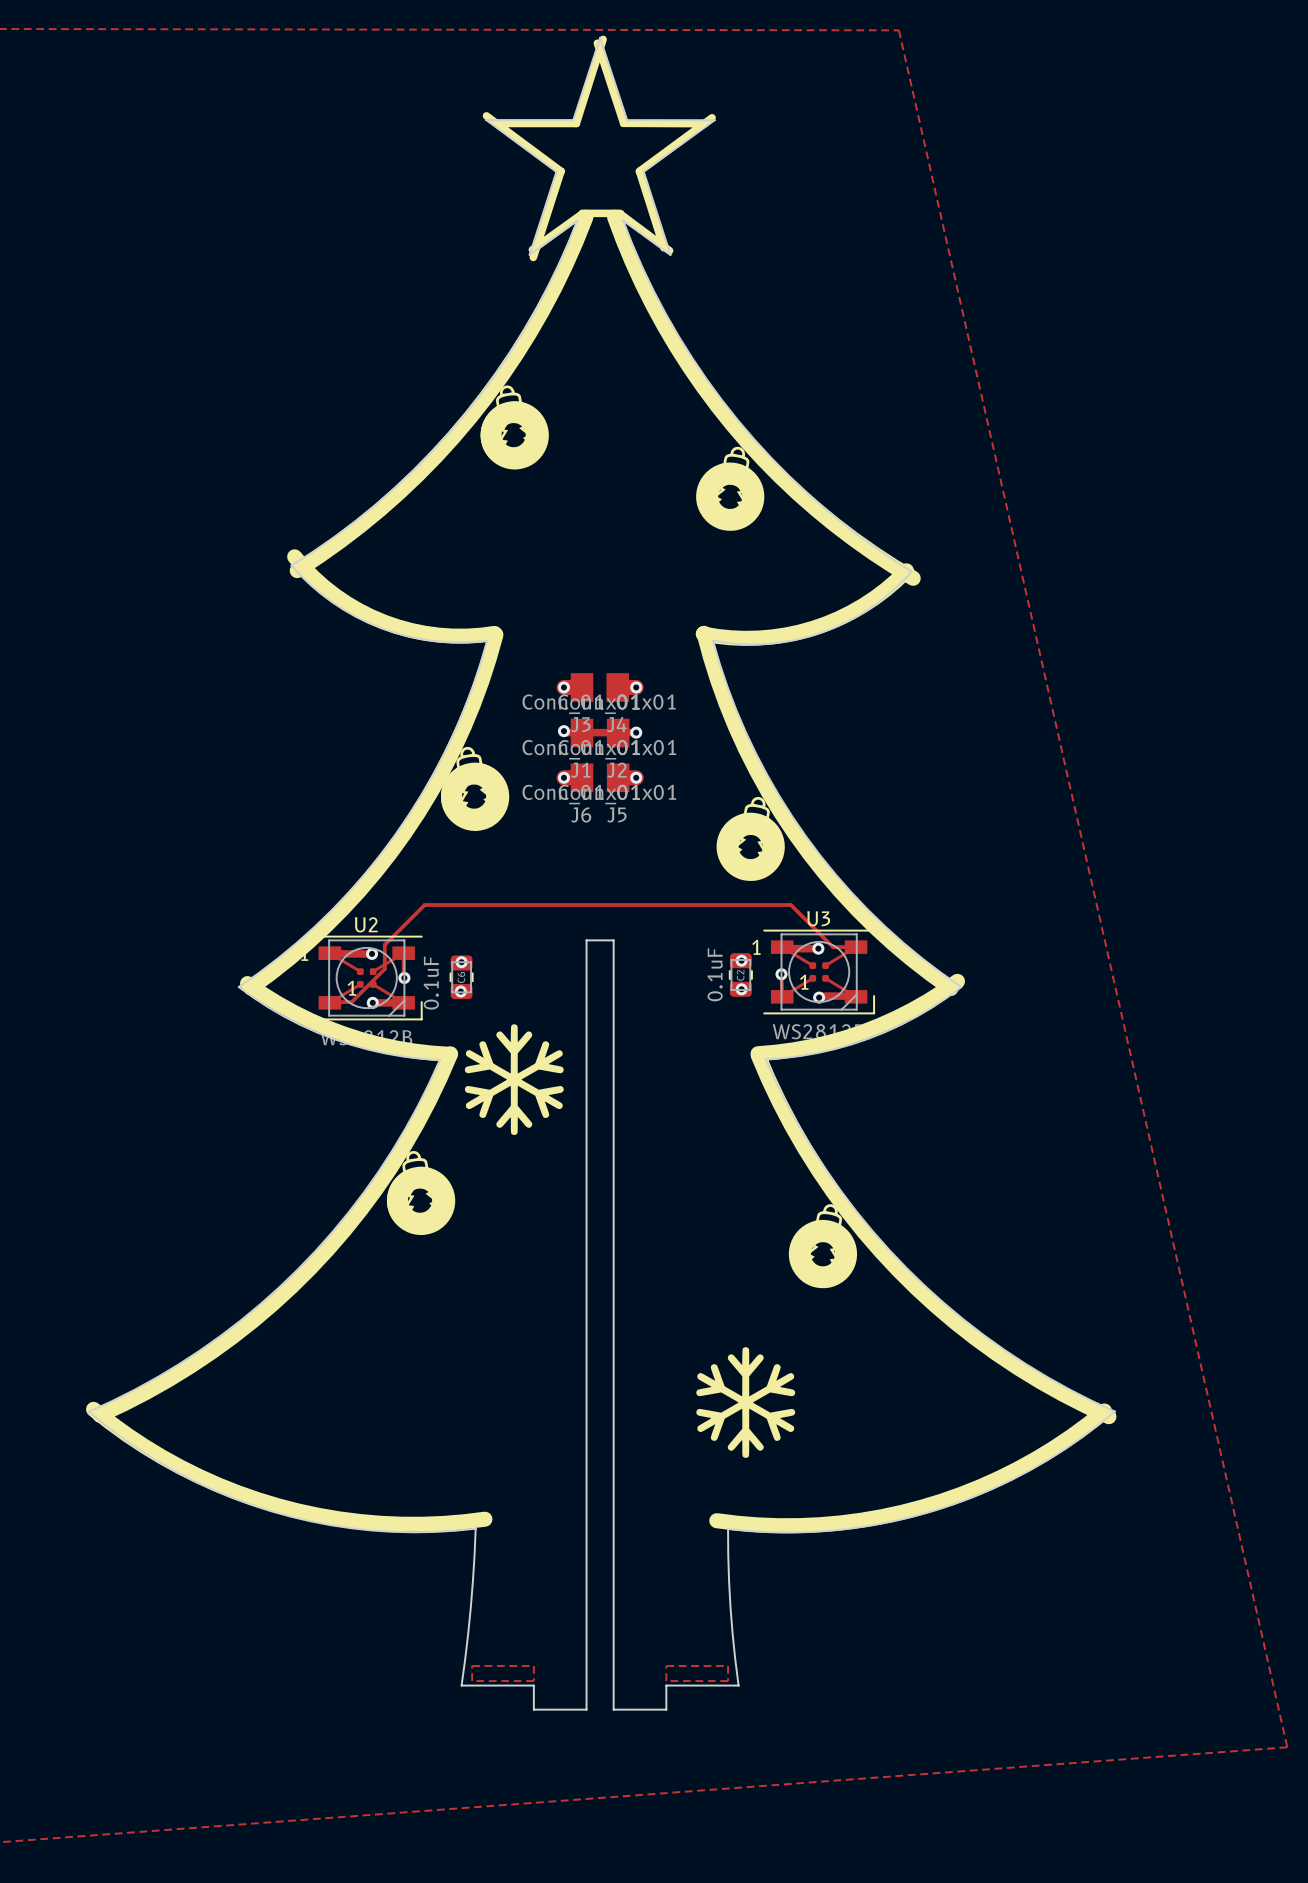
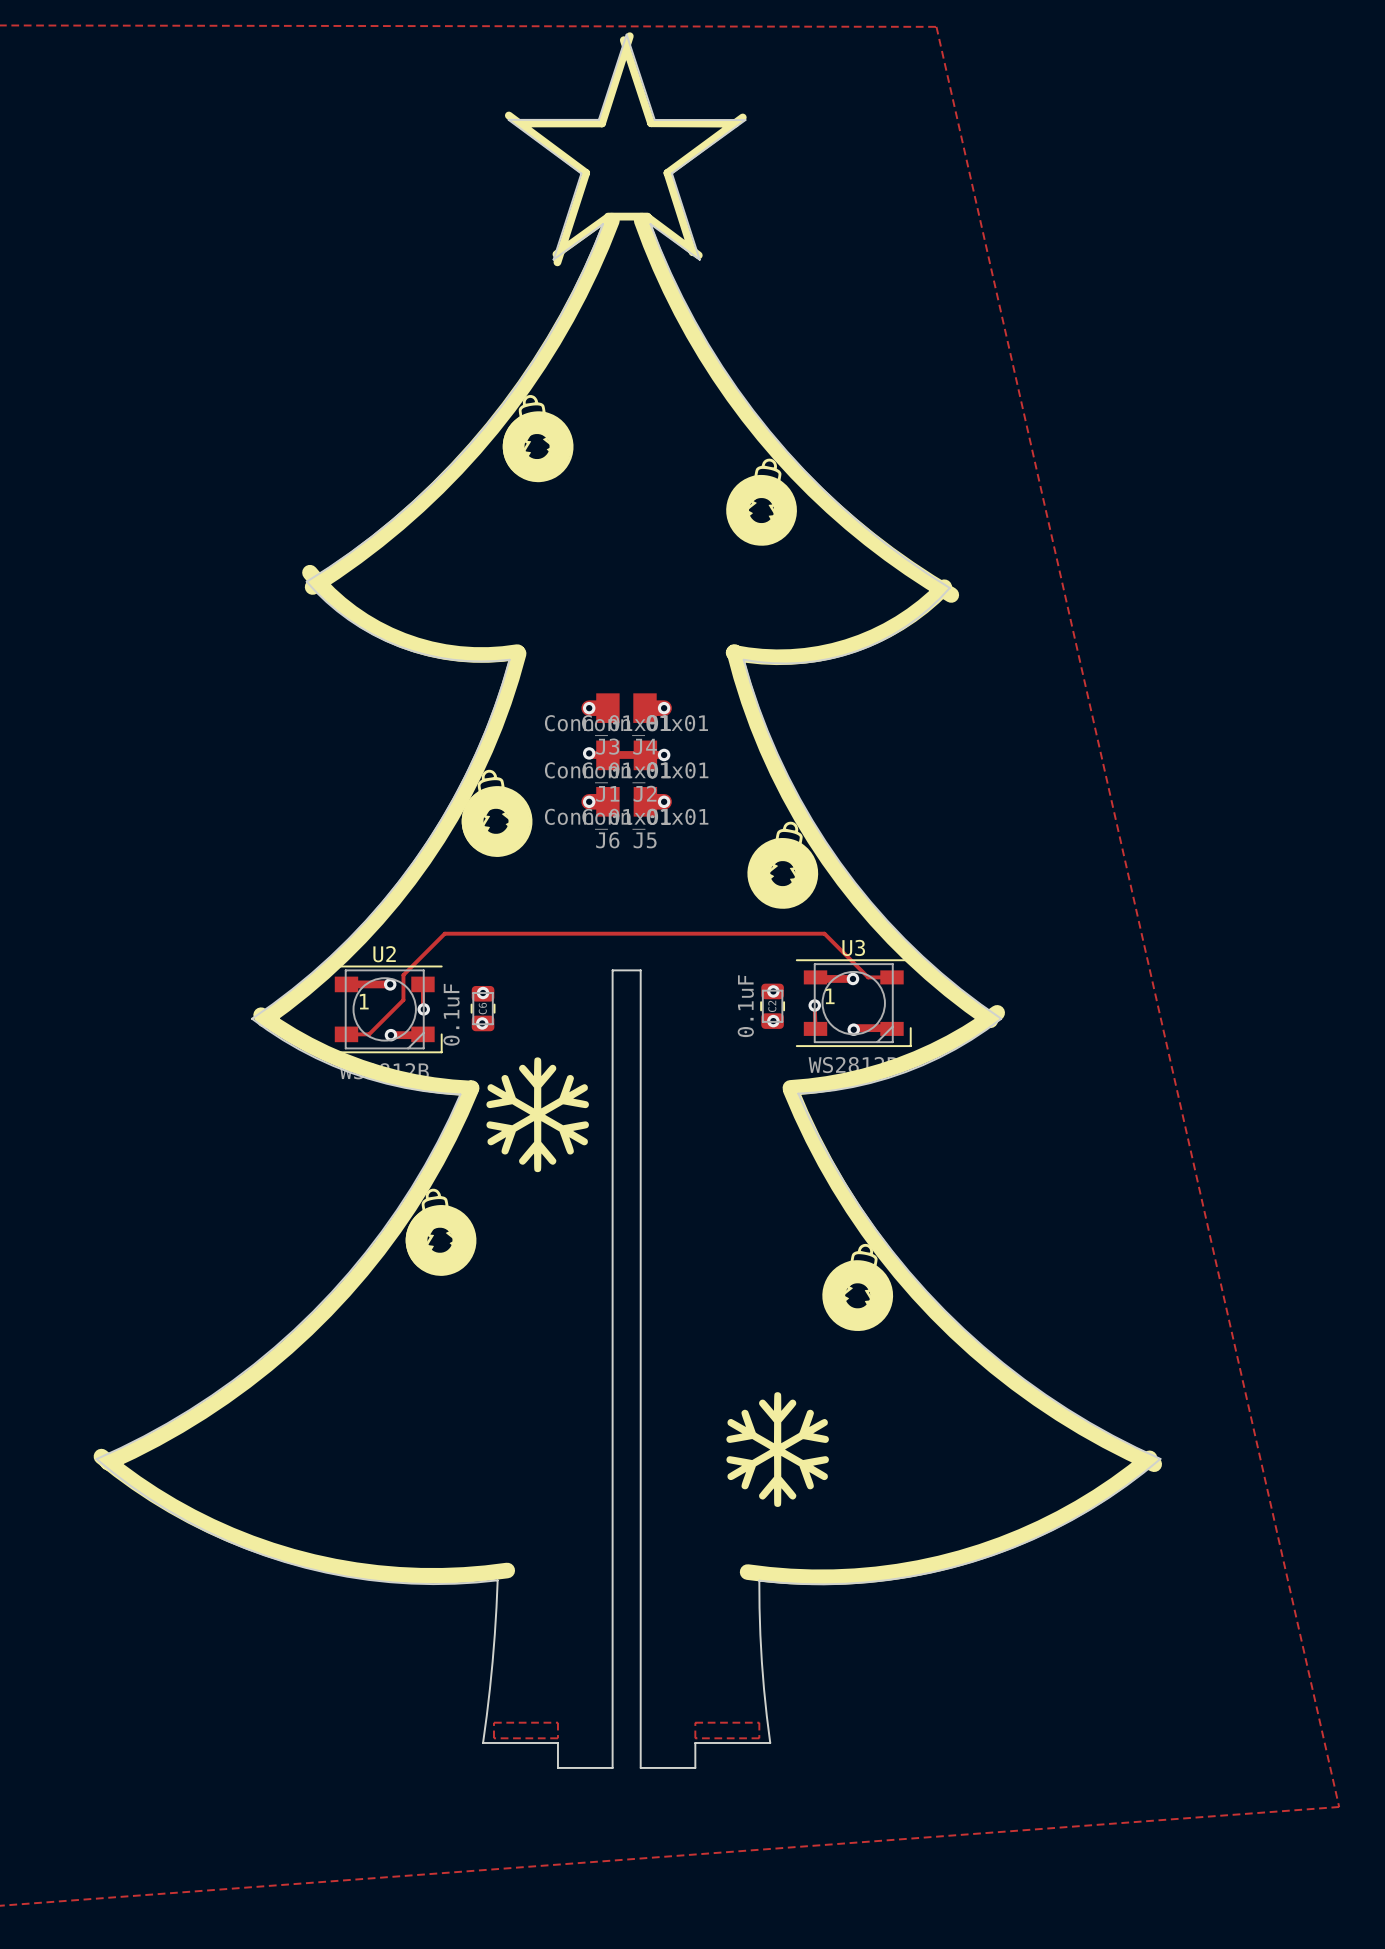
U3 footprint: [763, 929, 875, 1015] -> [795, 959, 912, 1048]
U2 footprint: [310, 935, 423, 1021] -> [326, 965, 443, 1054]

